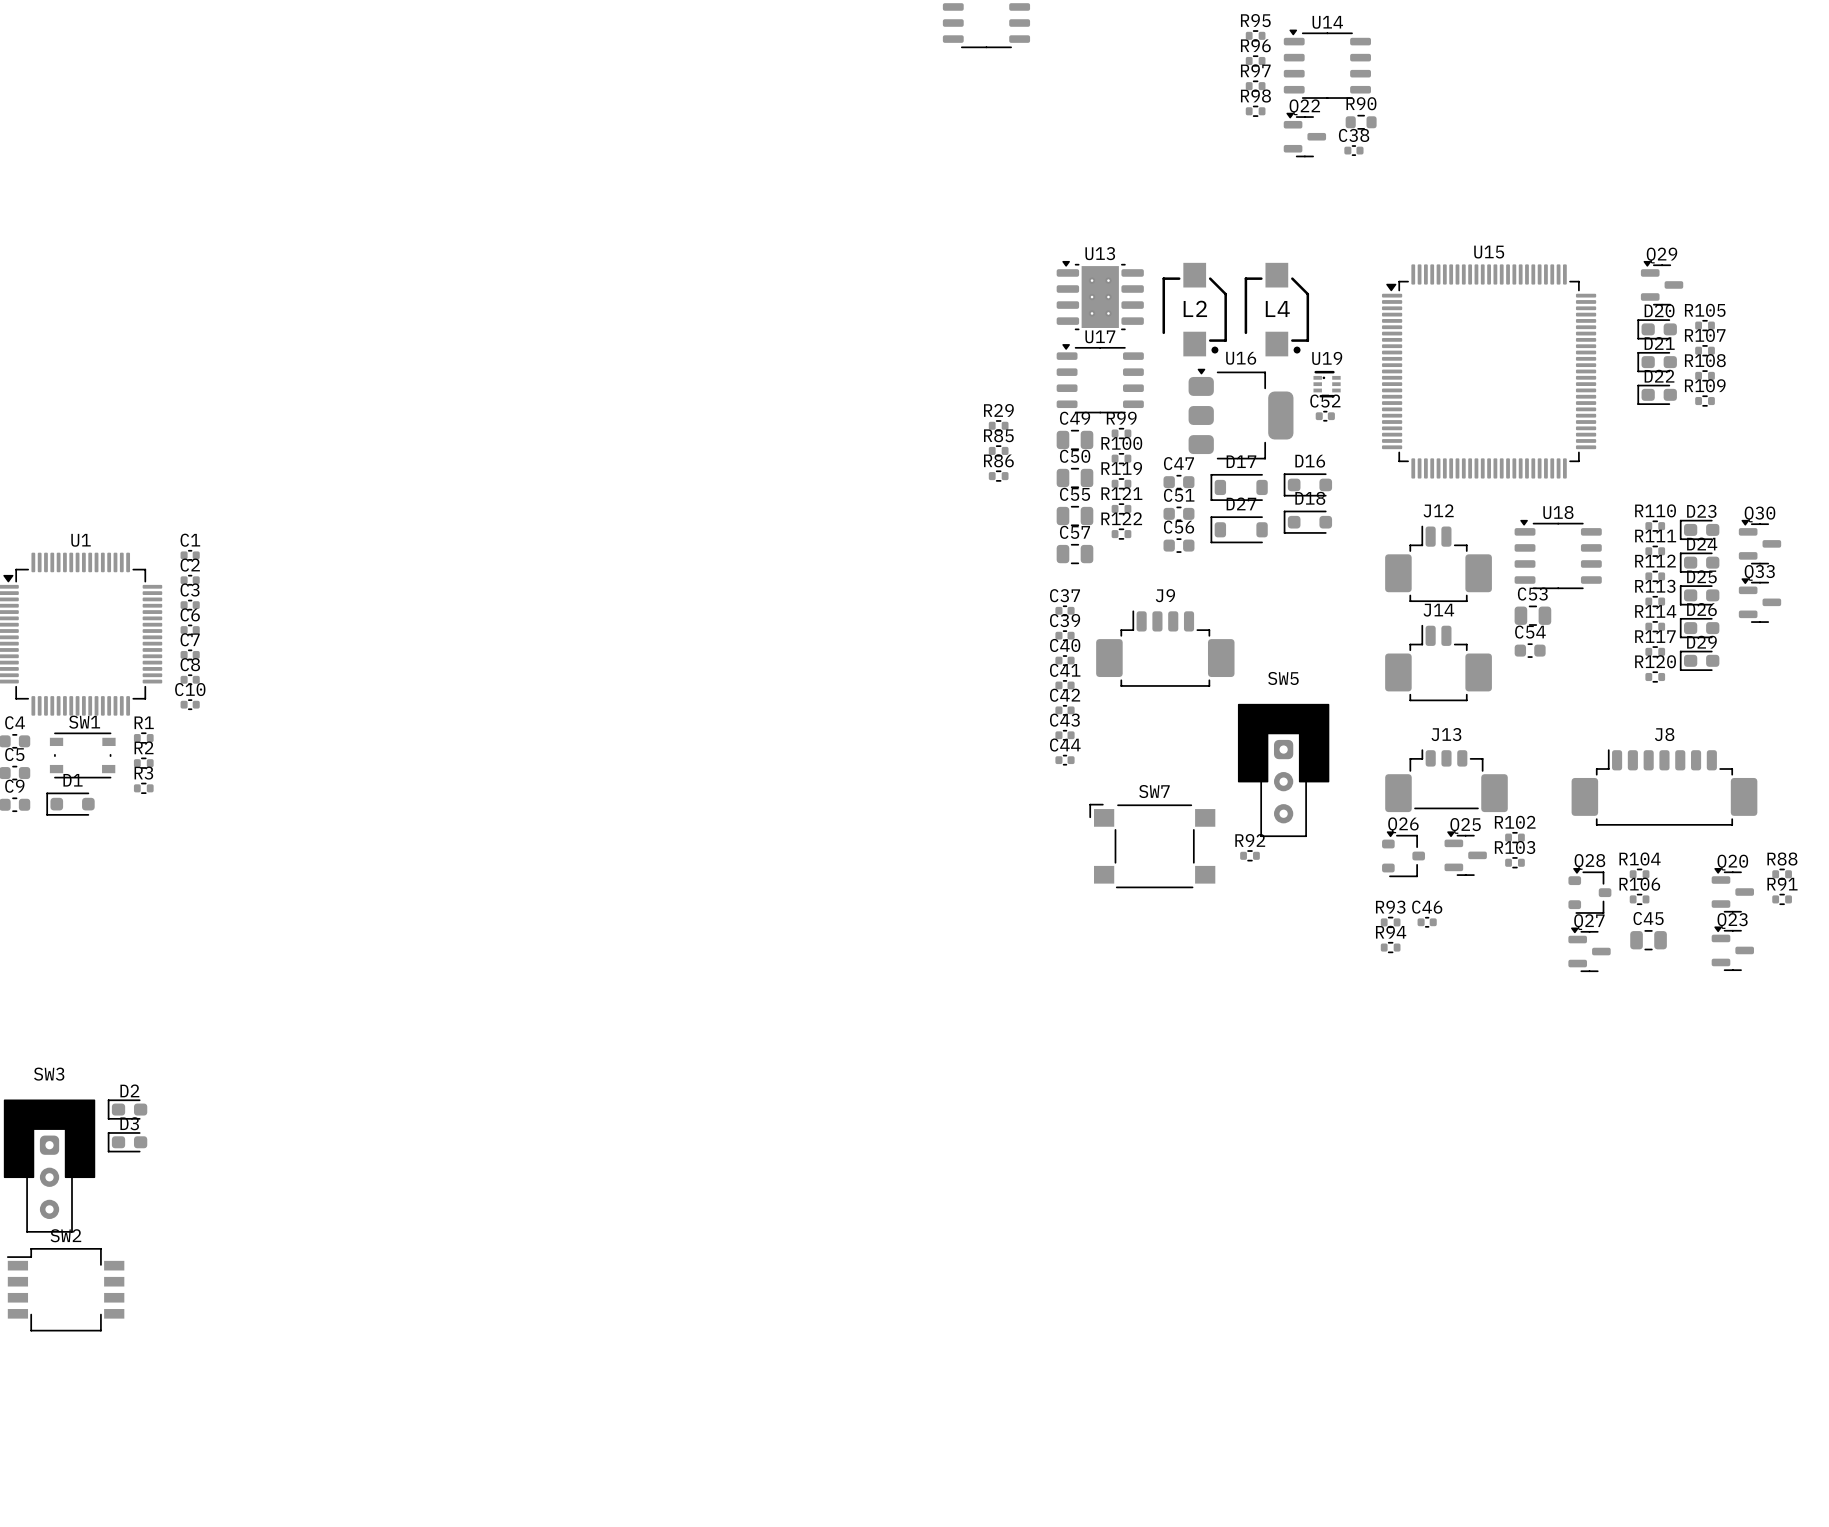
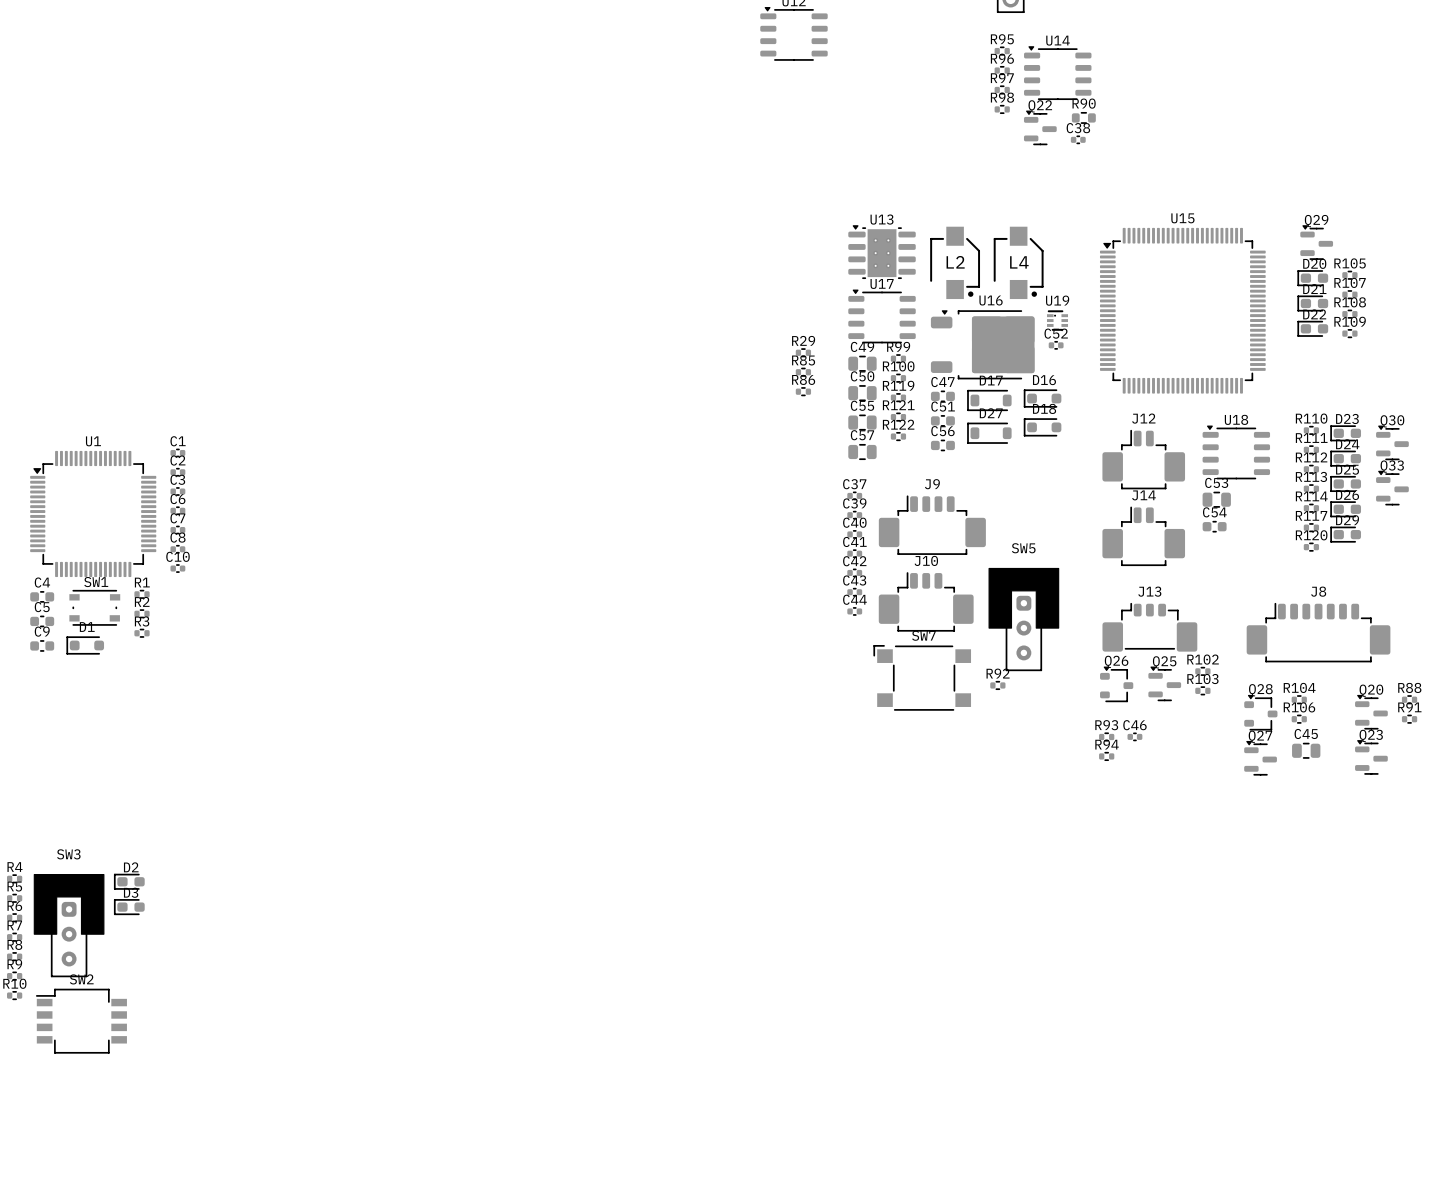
U16 footprint: [1188, 368, 1294, 460] -> [930, 310, 1035, 380]
J10: none -> (926, 601)

